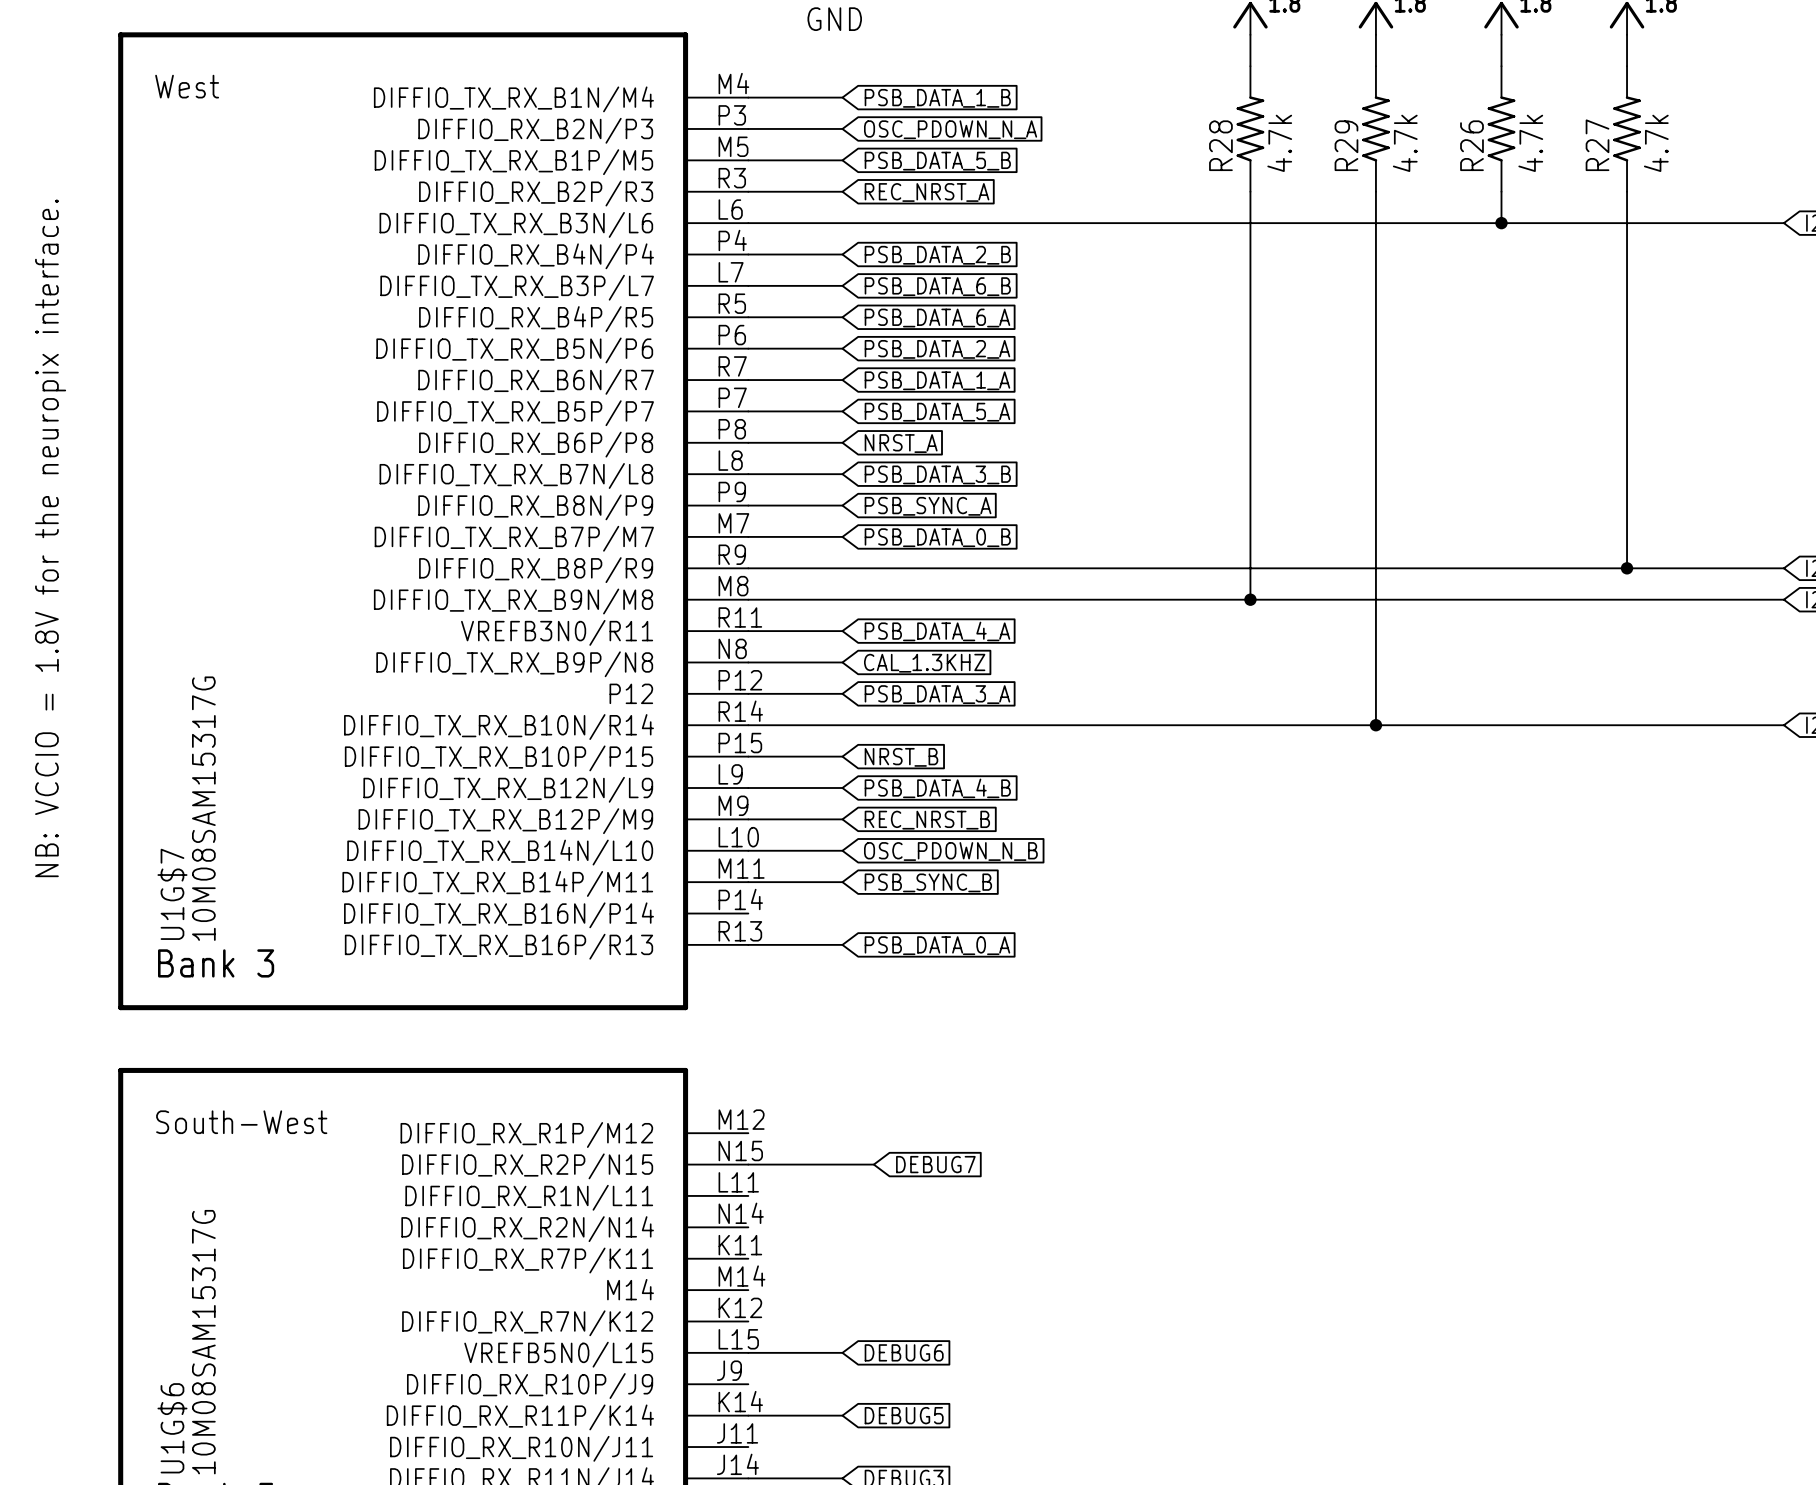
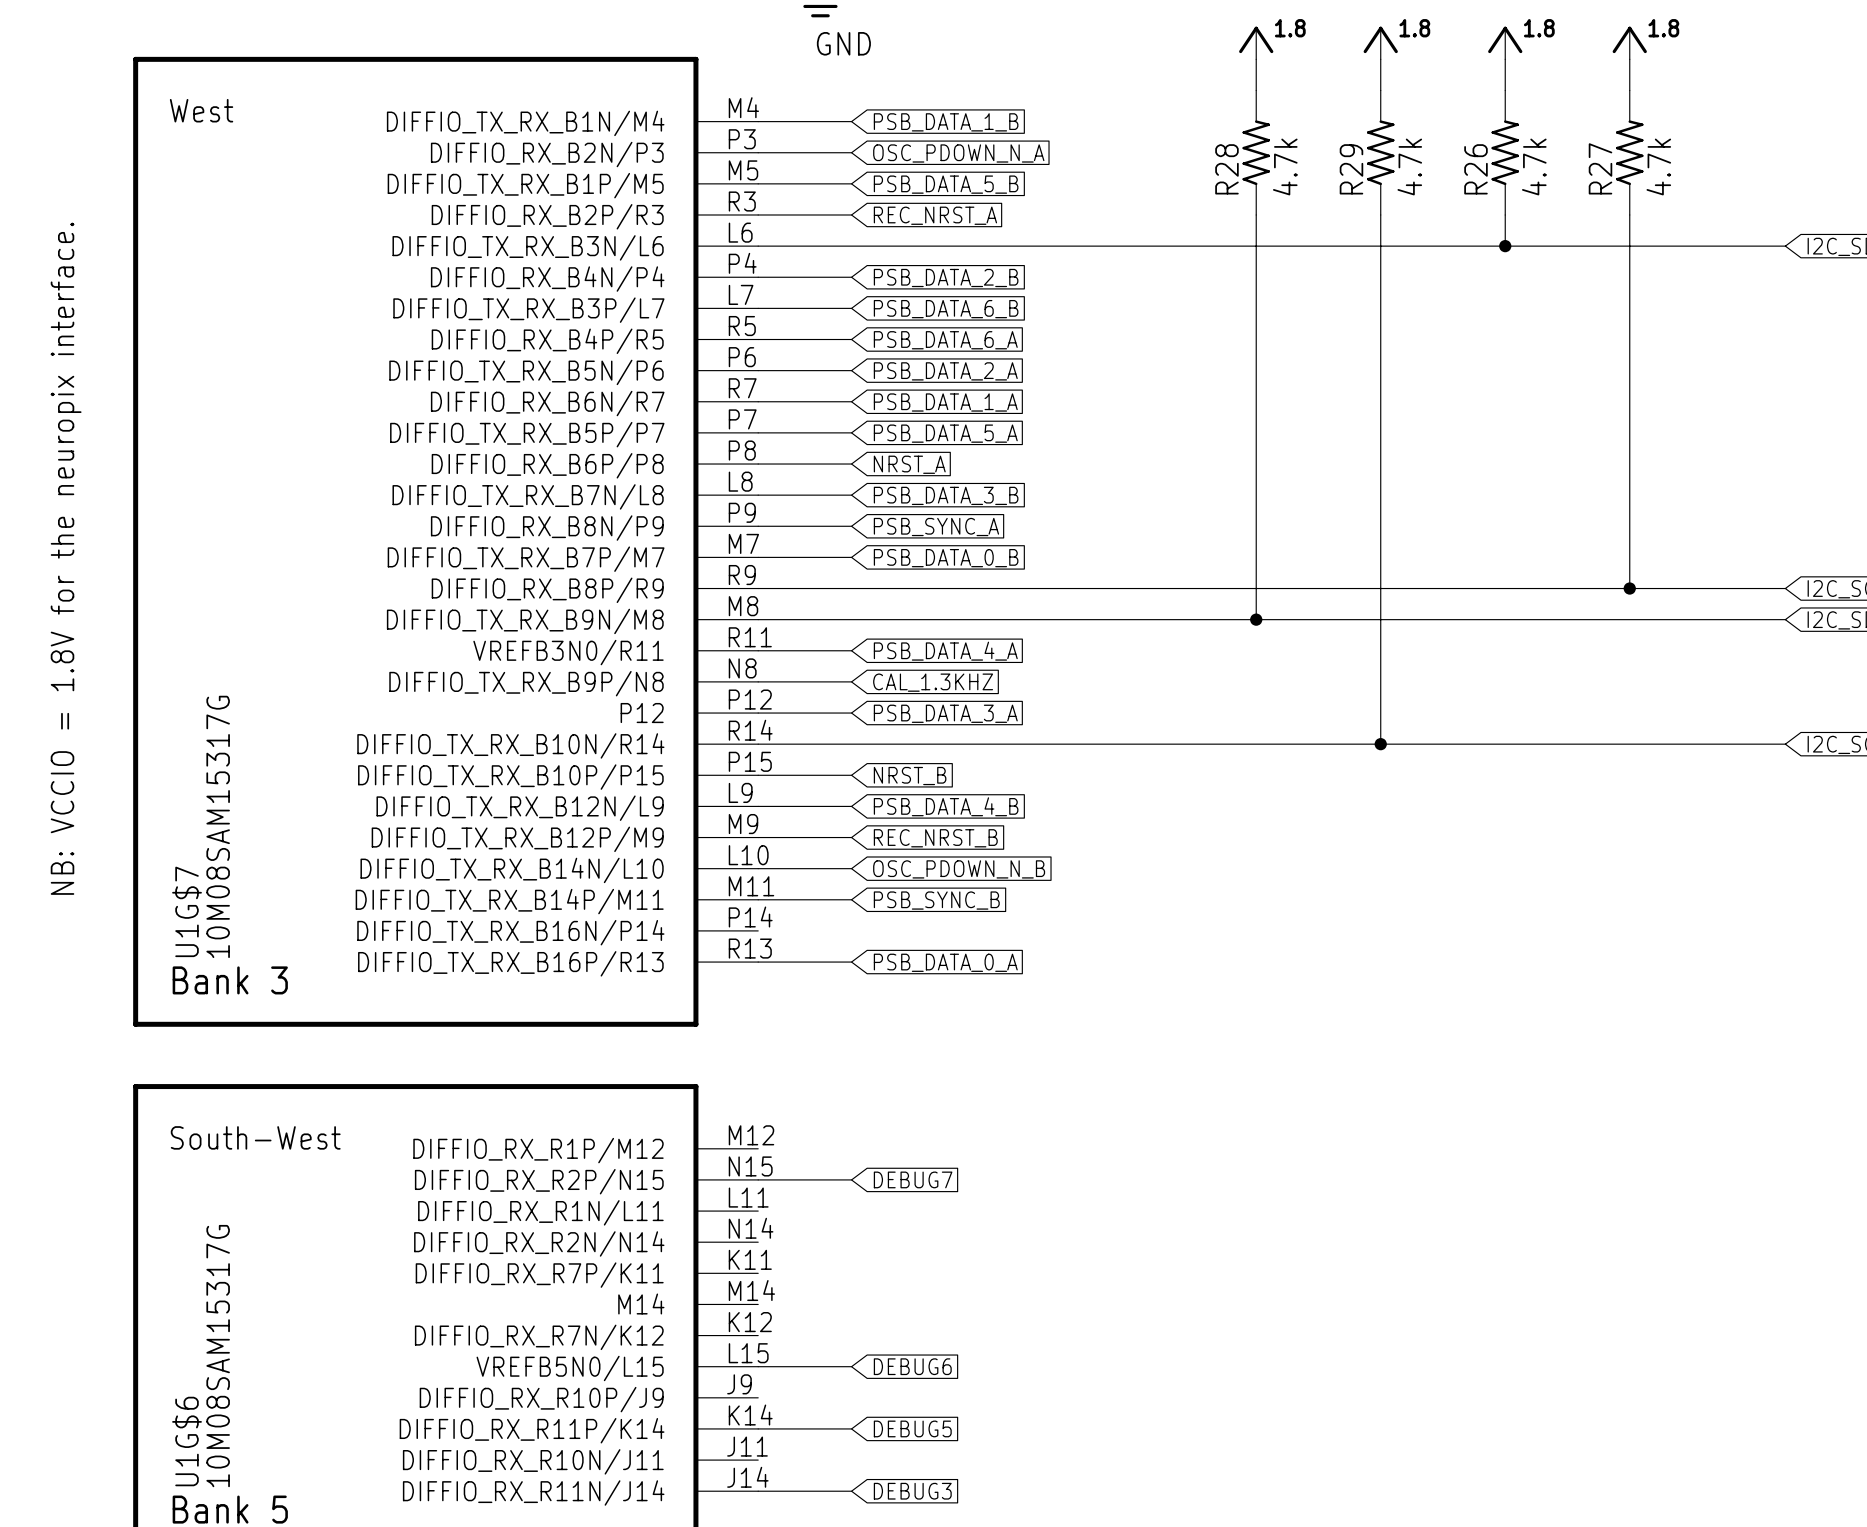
wire: (842, 1164) (873, 1164) -> none
global label position: DEBUG7 (935, 1164) -> DEBUG7 (913, 1179)

